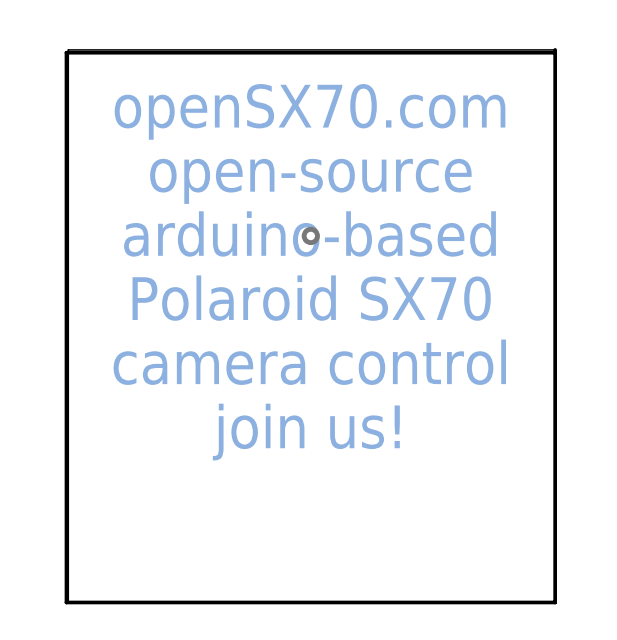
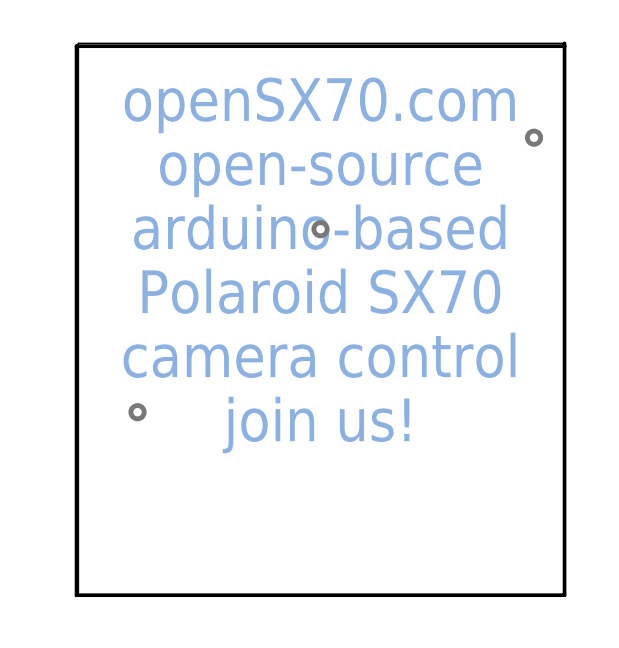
via: none -> (534, 137)
via: none -> (137, 412)

